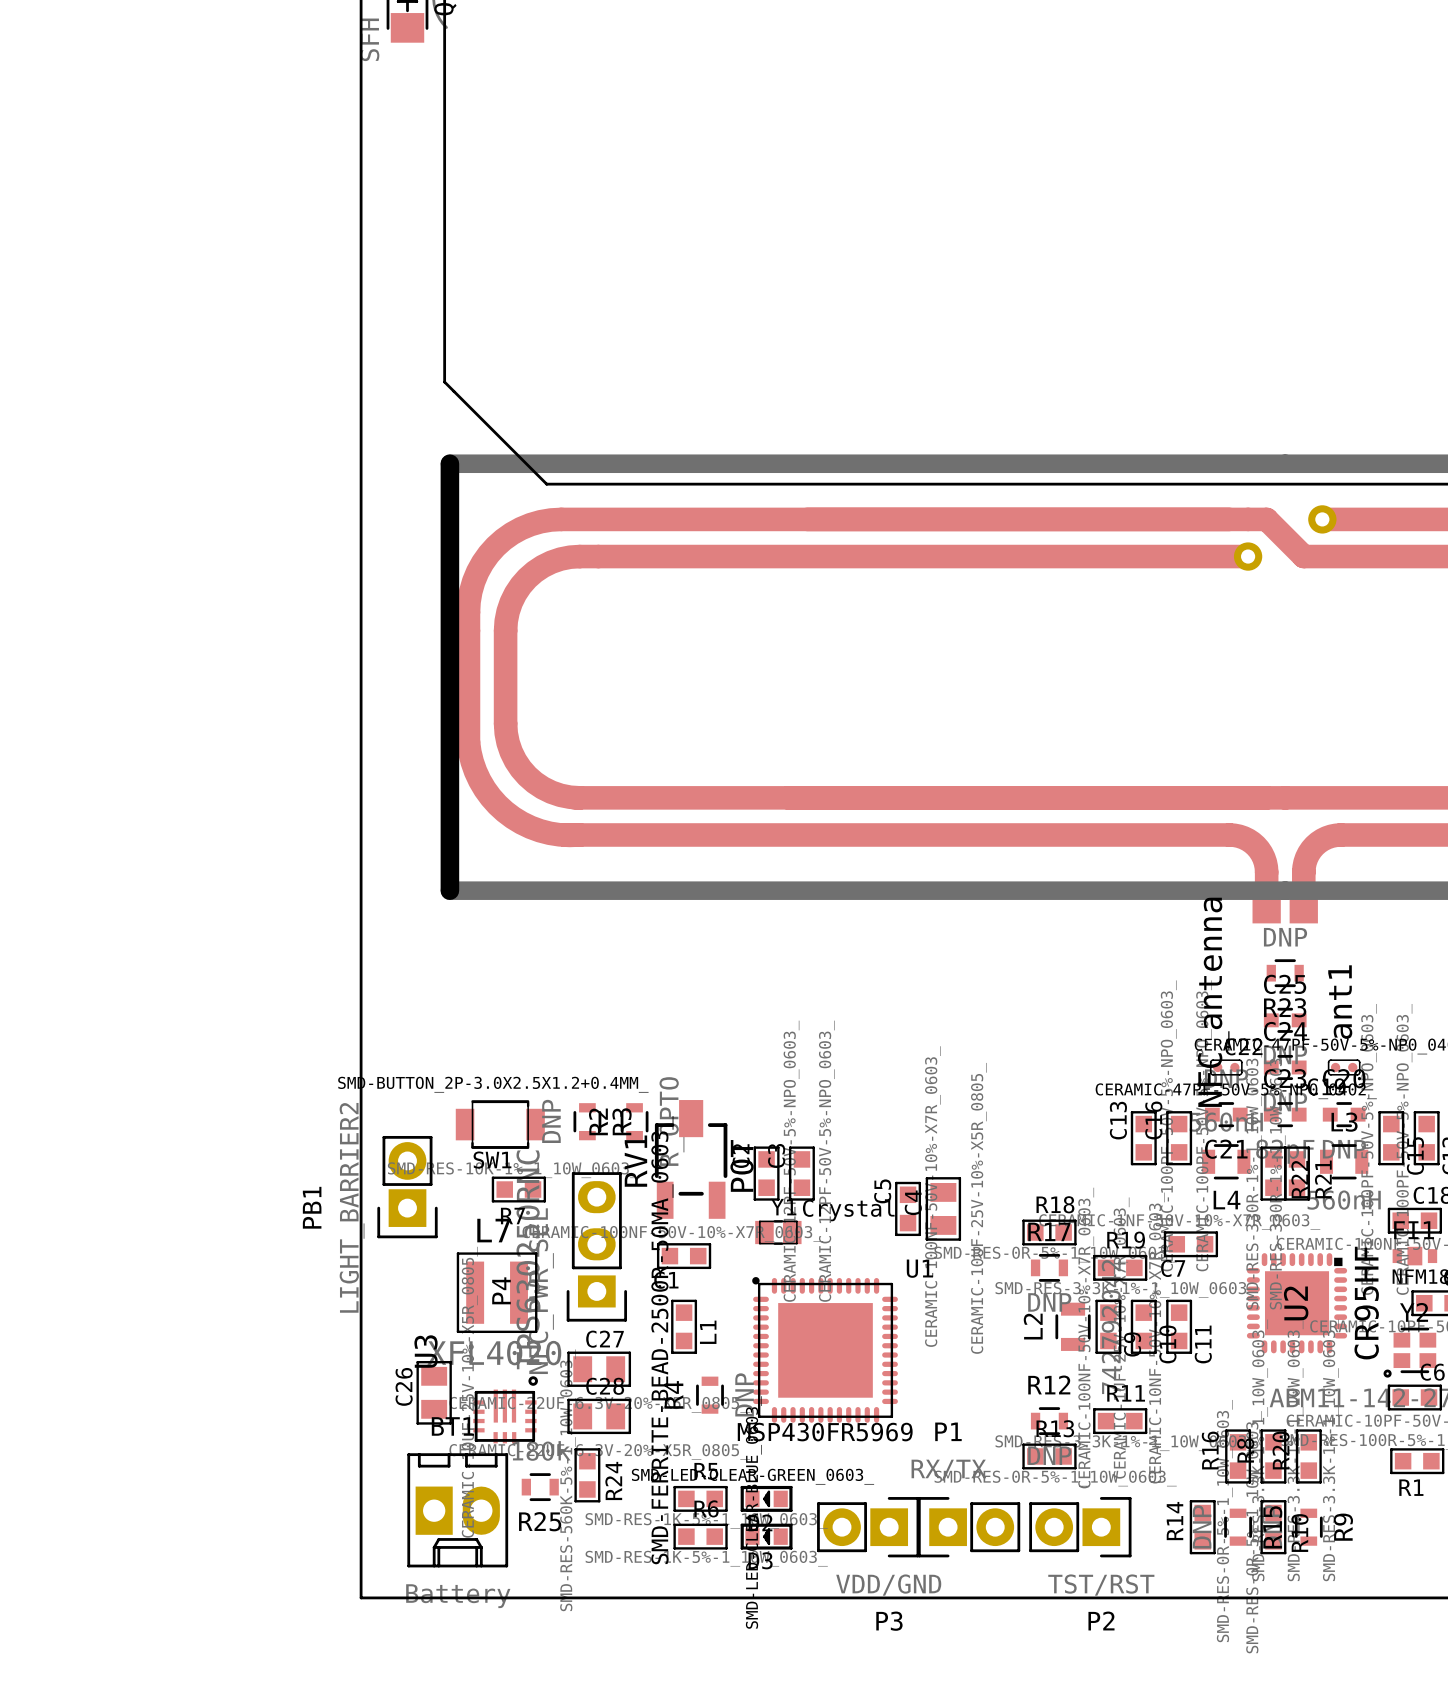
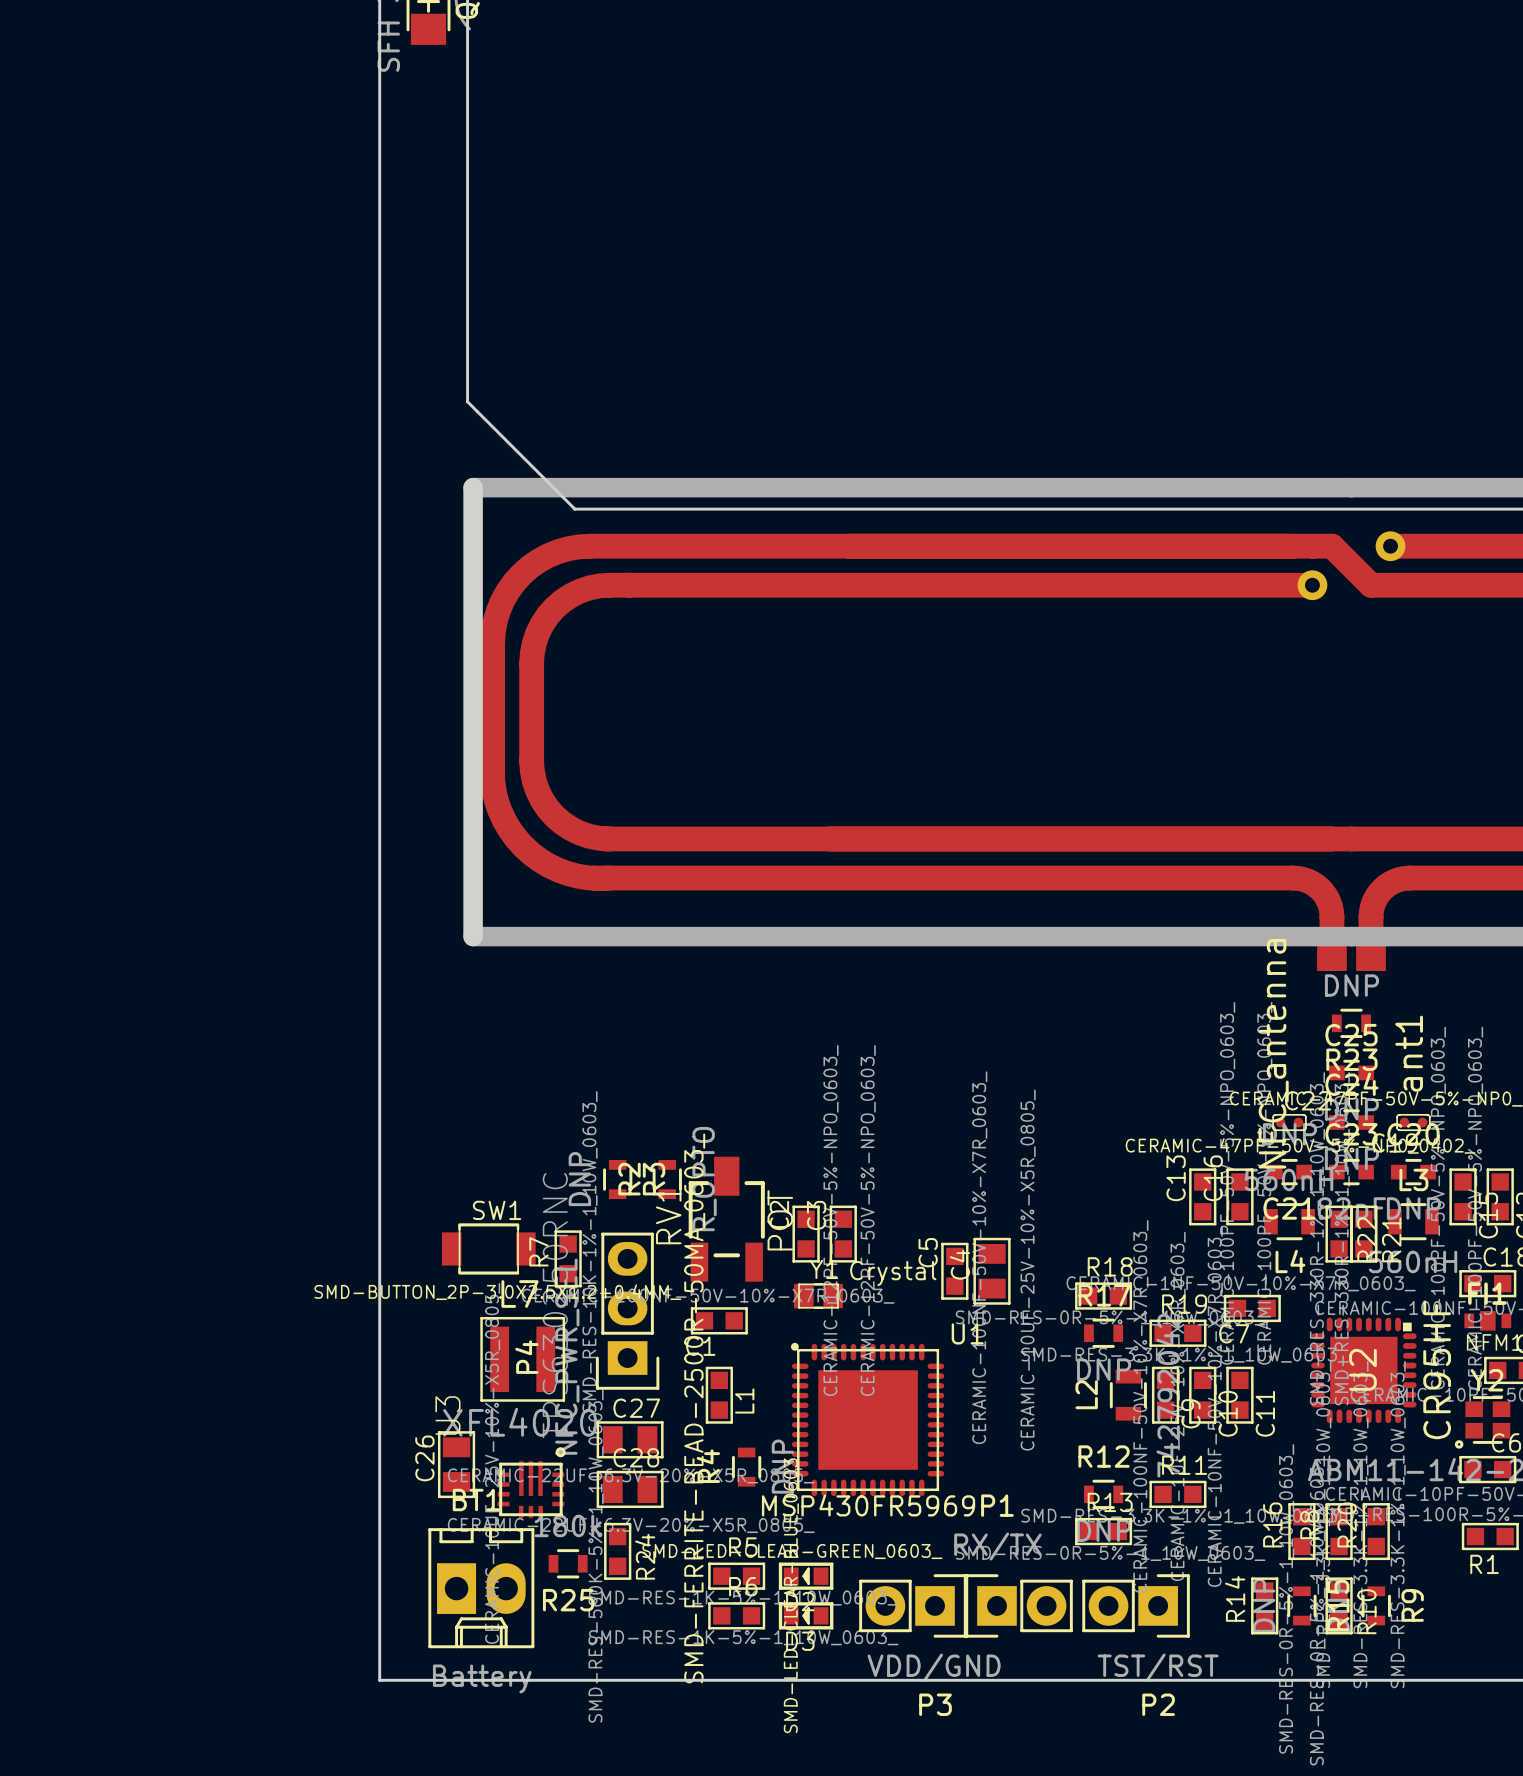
SW1 rotation: 0° (500, 1124) -> 180° (488, 1248)
SW1 position: (500, 1124) -> (488, 1248)
PB1: LIGHT_BARRIER2 (407, 1187) -> none
R7 rotation: 0° (518, 1189) -> 90° clockwise (568, 1258)

